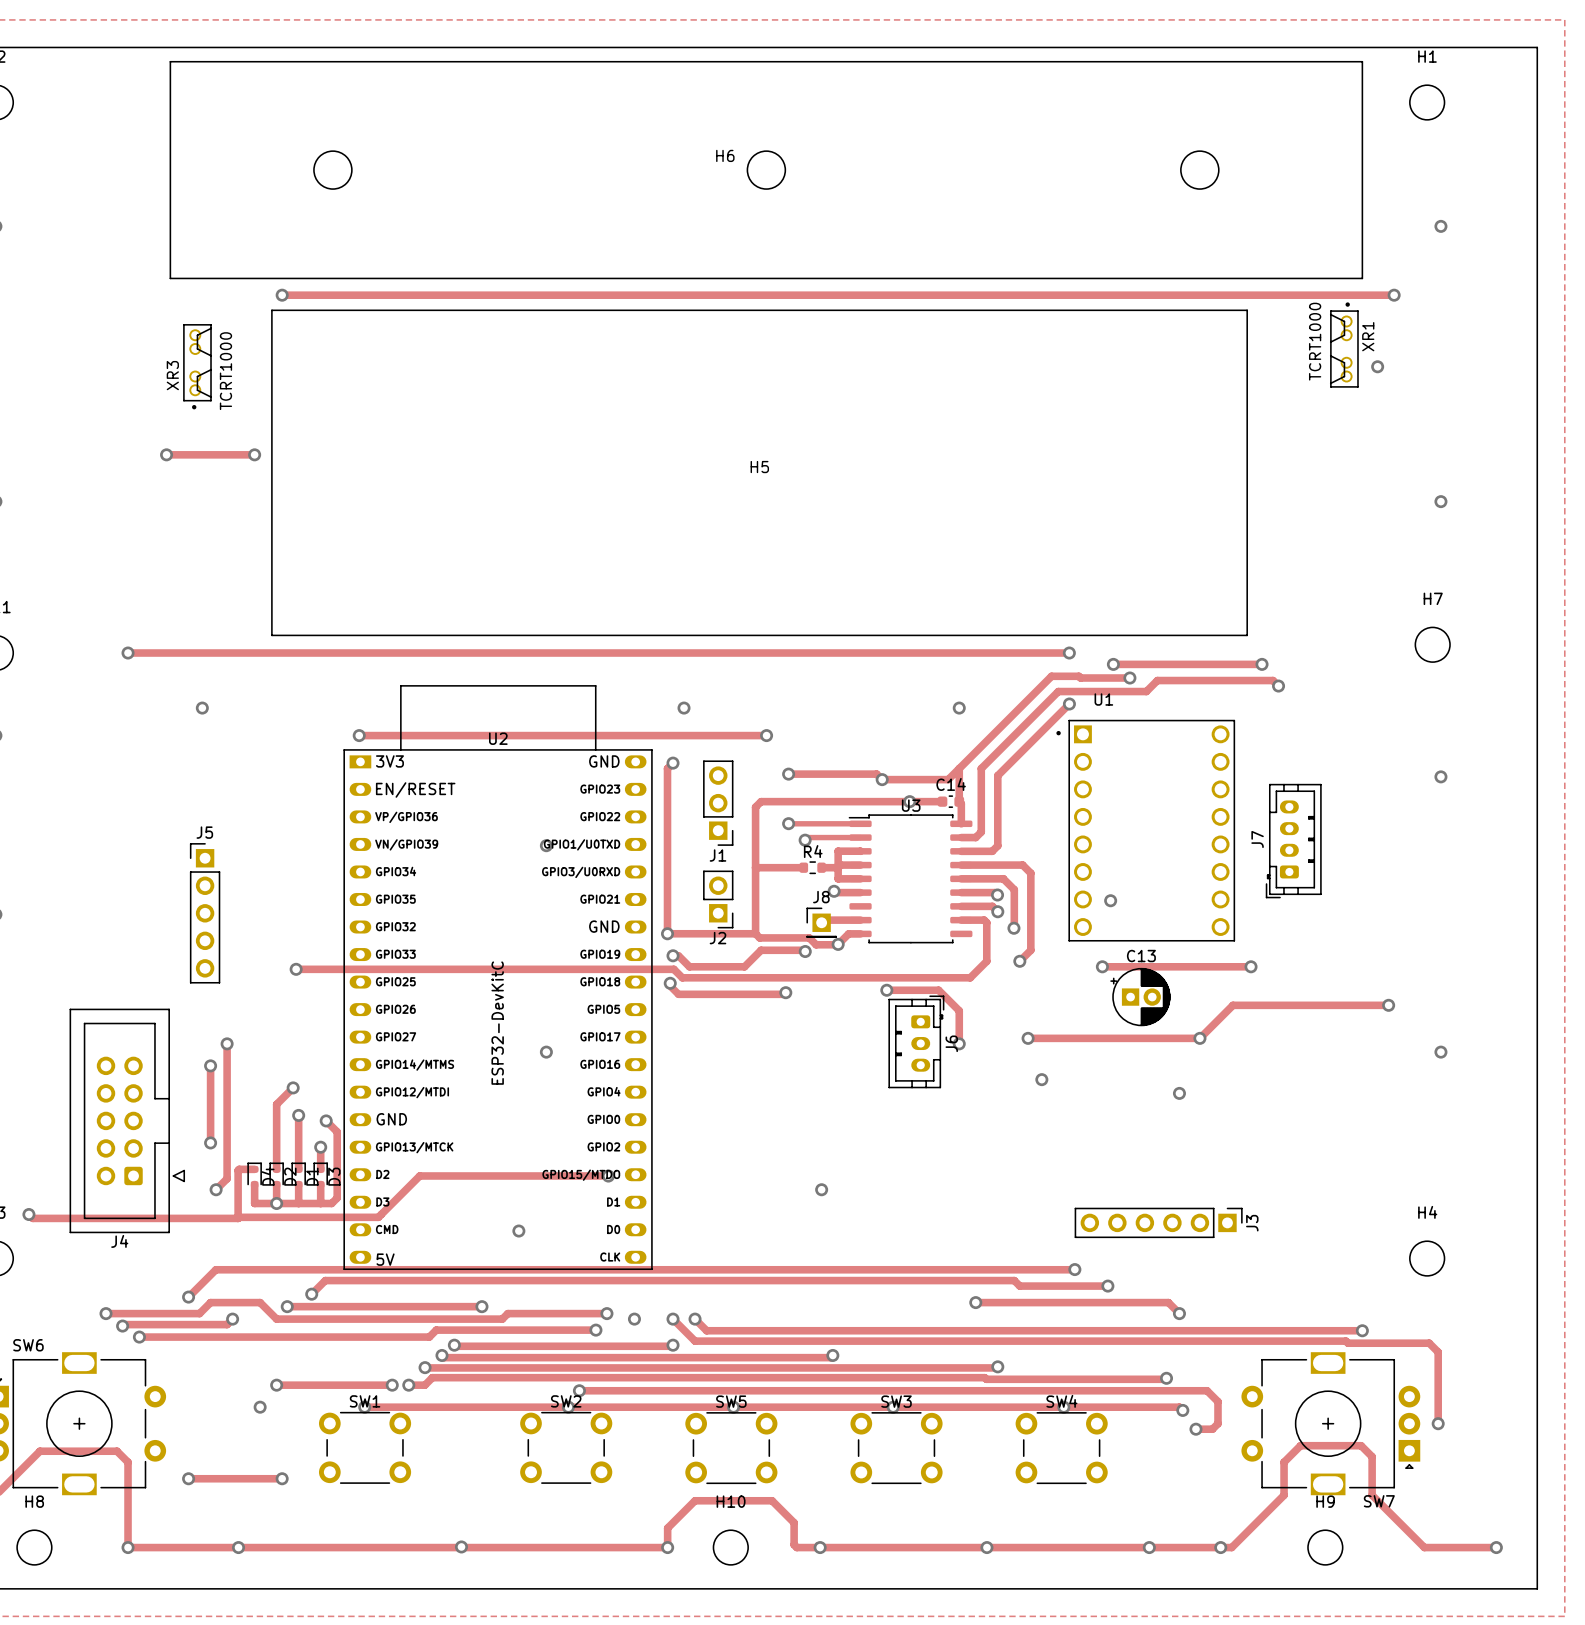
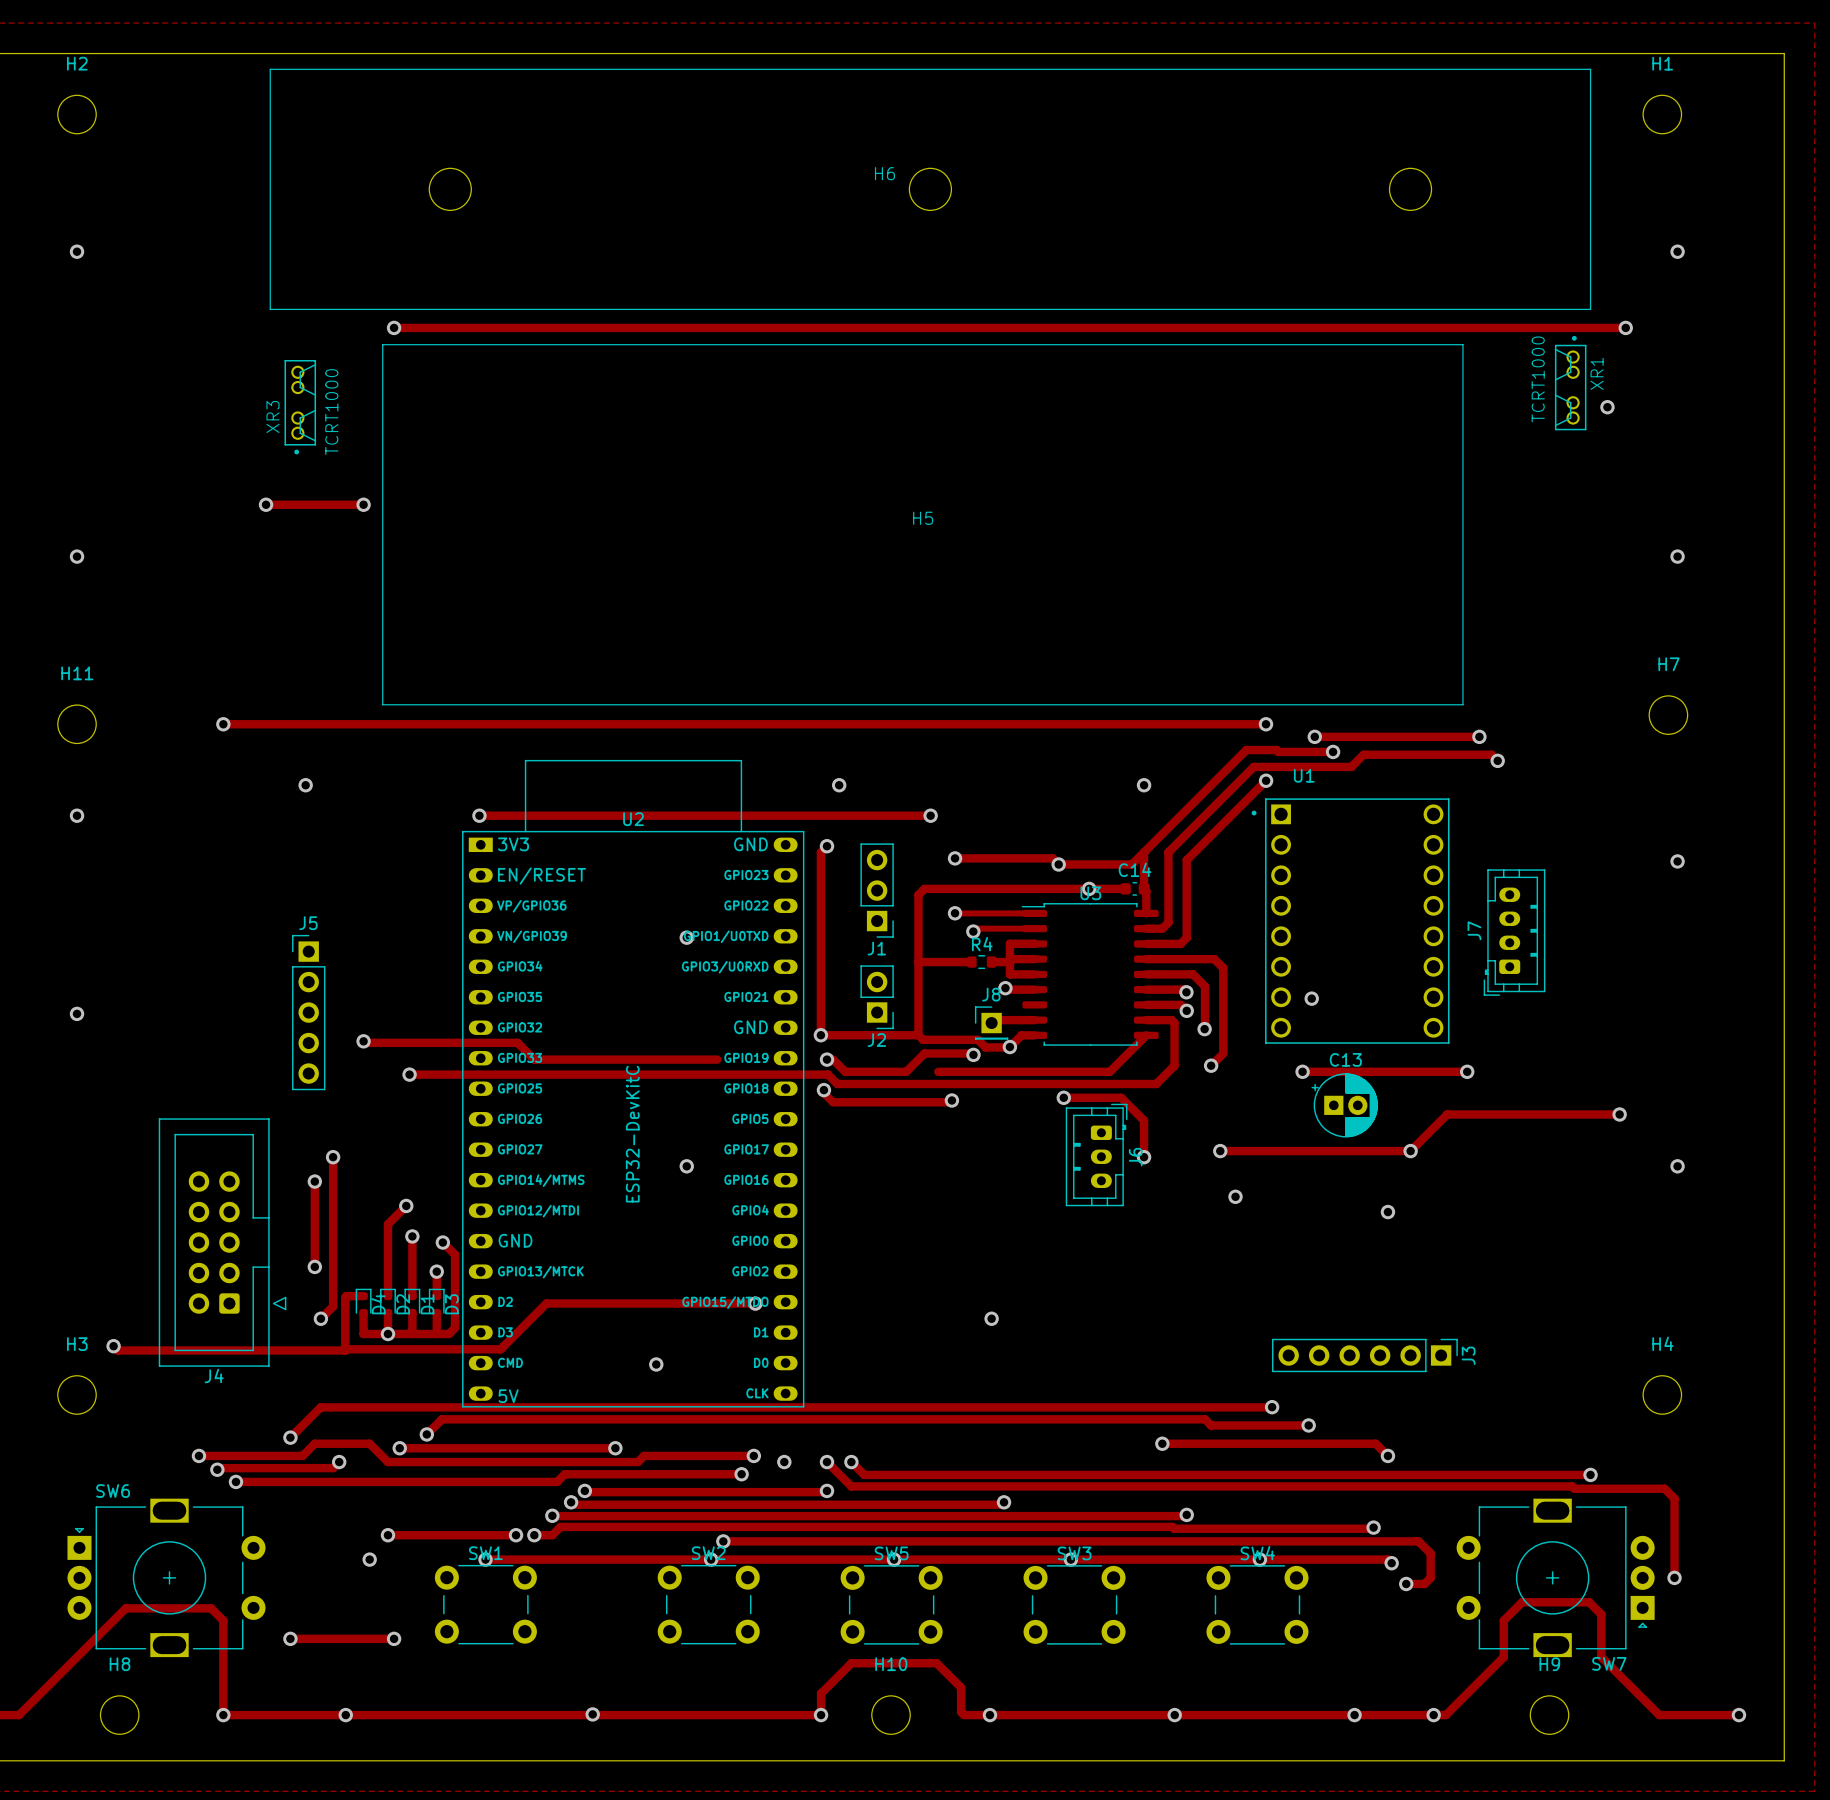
track: none -> (1146, 1035) (1109, 1071) (938, 1071)
track: none -> (363, 1041) (365, 1042) (517, 1042) (534, 1059) (717, 1059)
via: none -> (363, 1041)

